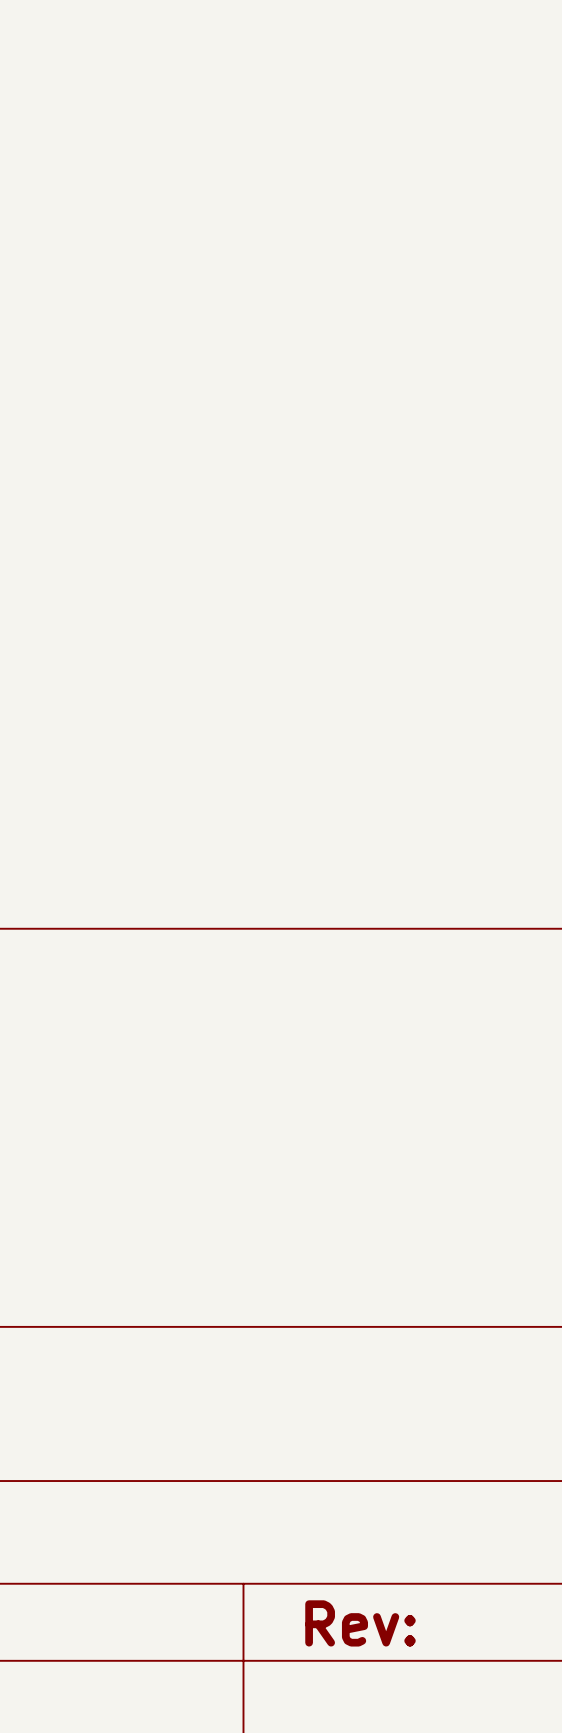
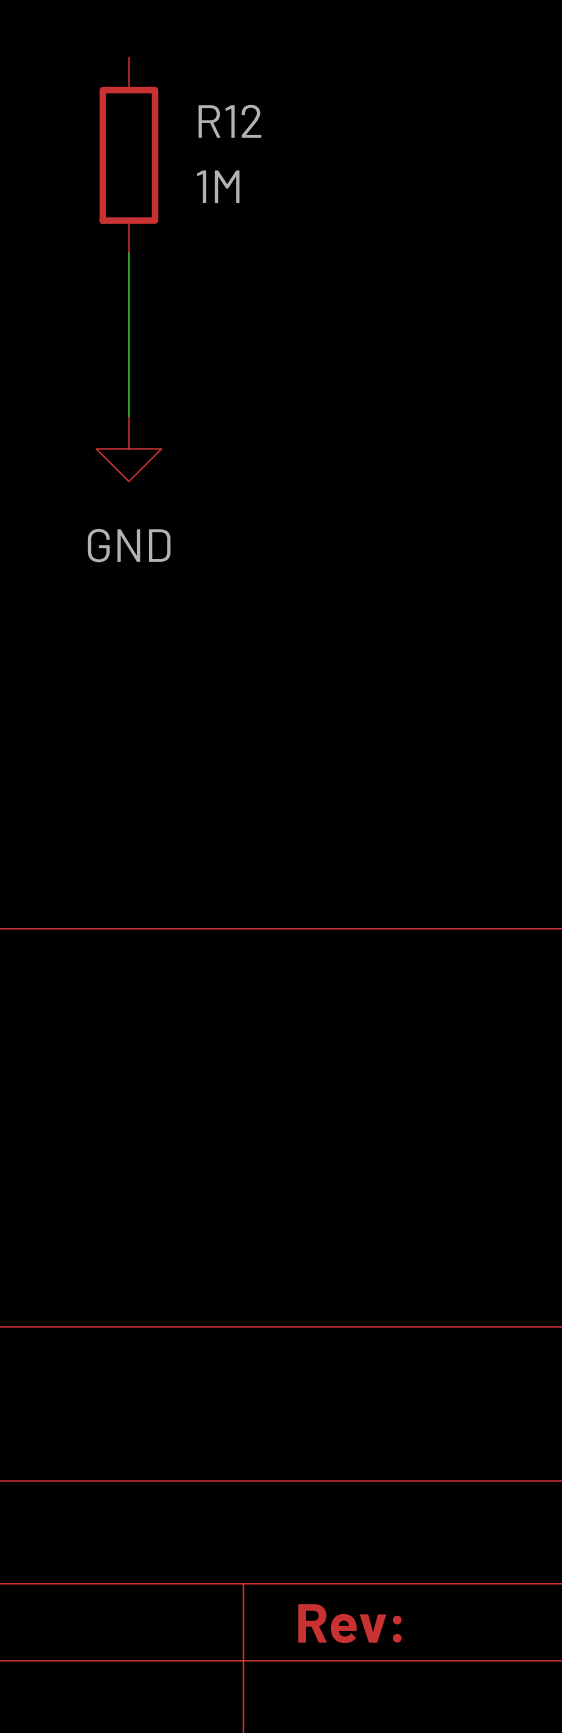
R12: none -> 1M (128, 155)
wire: none -> (128, 253) (128, 416)
power symbol: none -> GND (128, 448)

